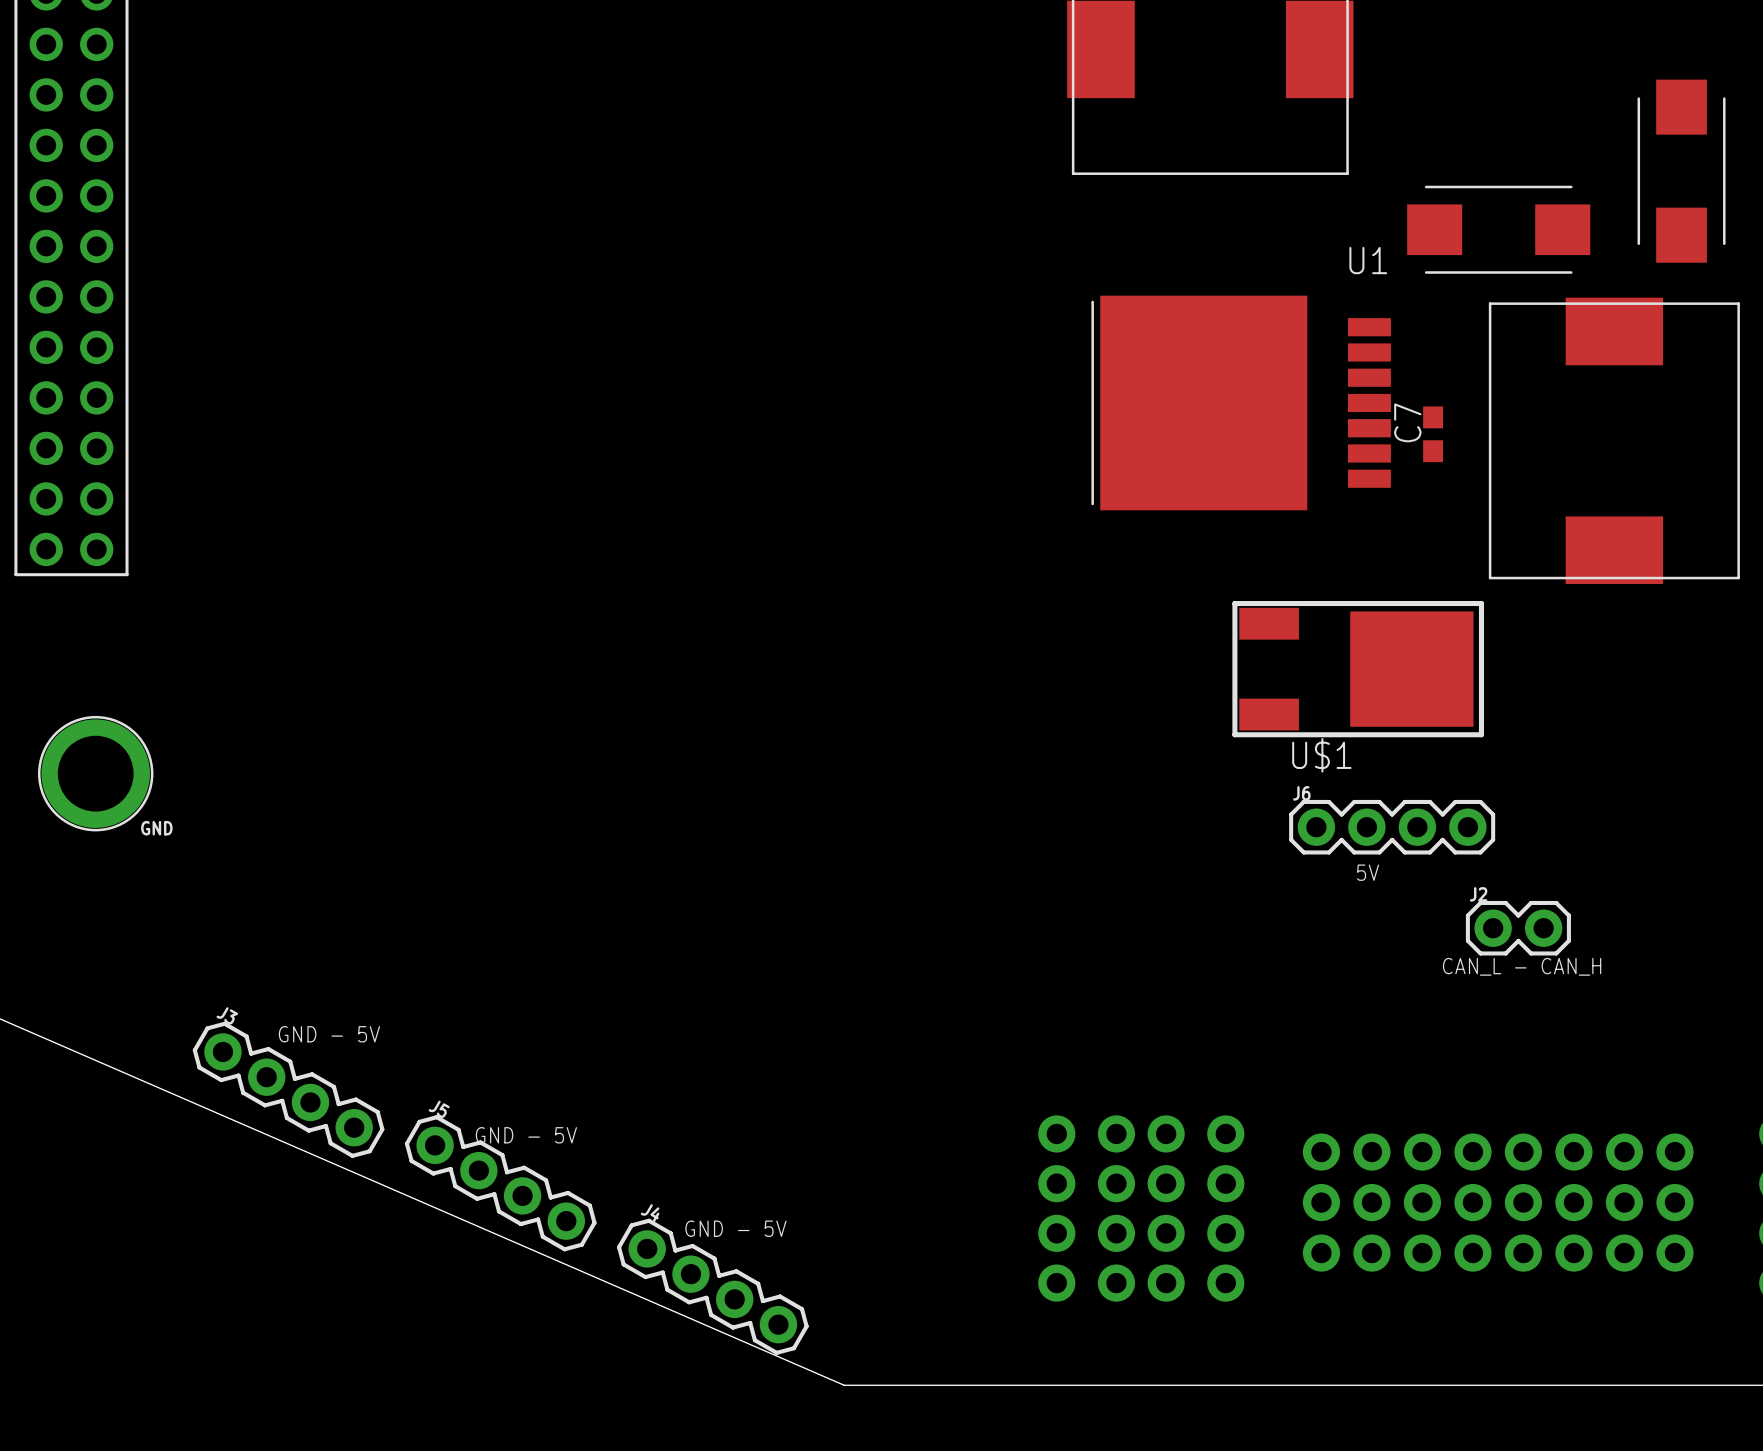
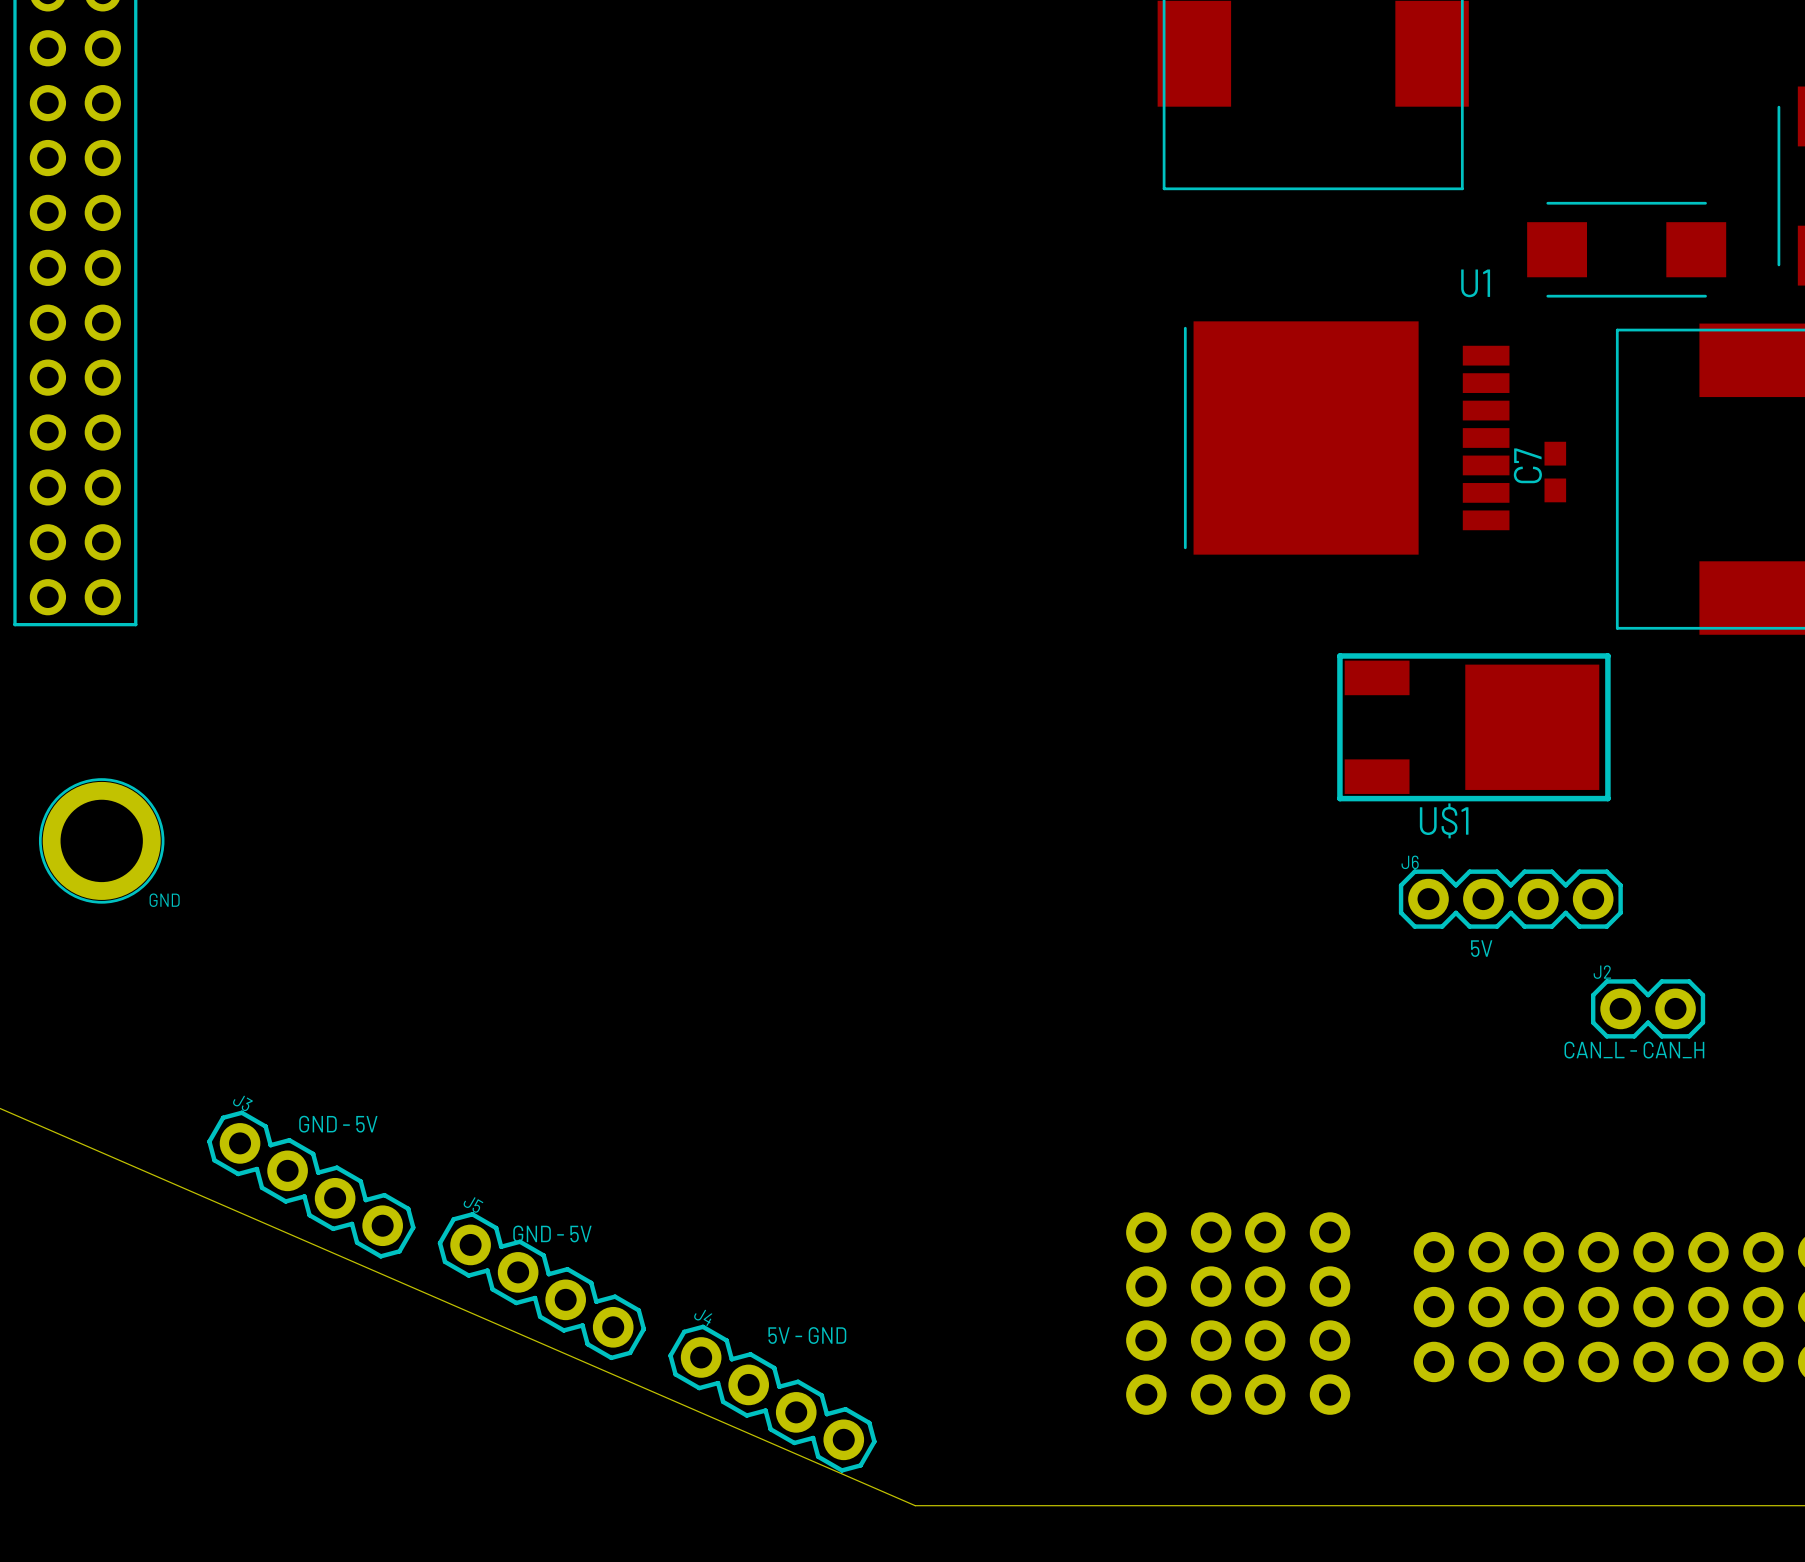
text: GND - 5V (735, 1228) -> none
text: none -> 5V - GND (807, 1335)

